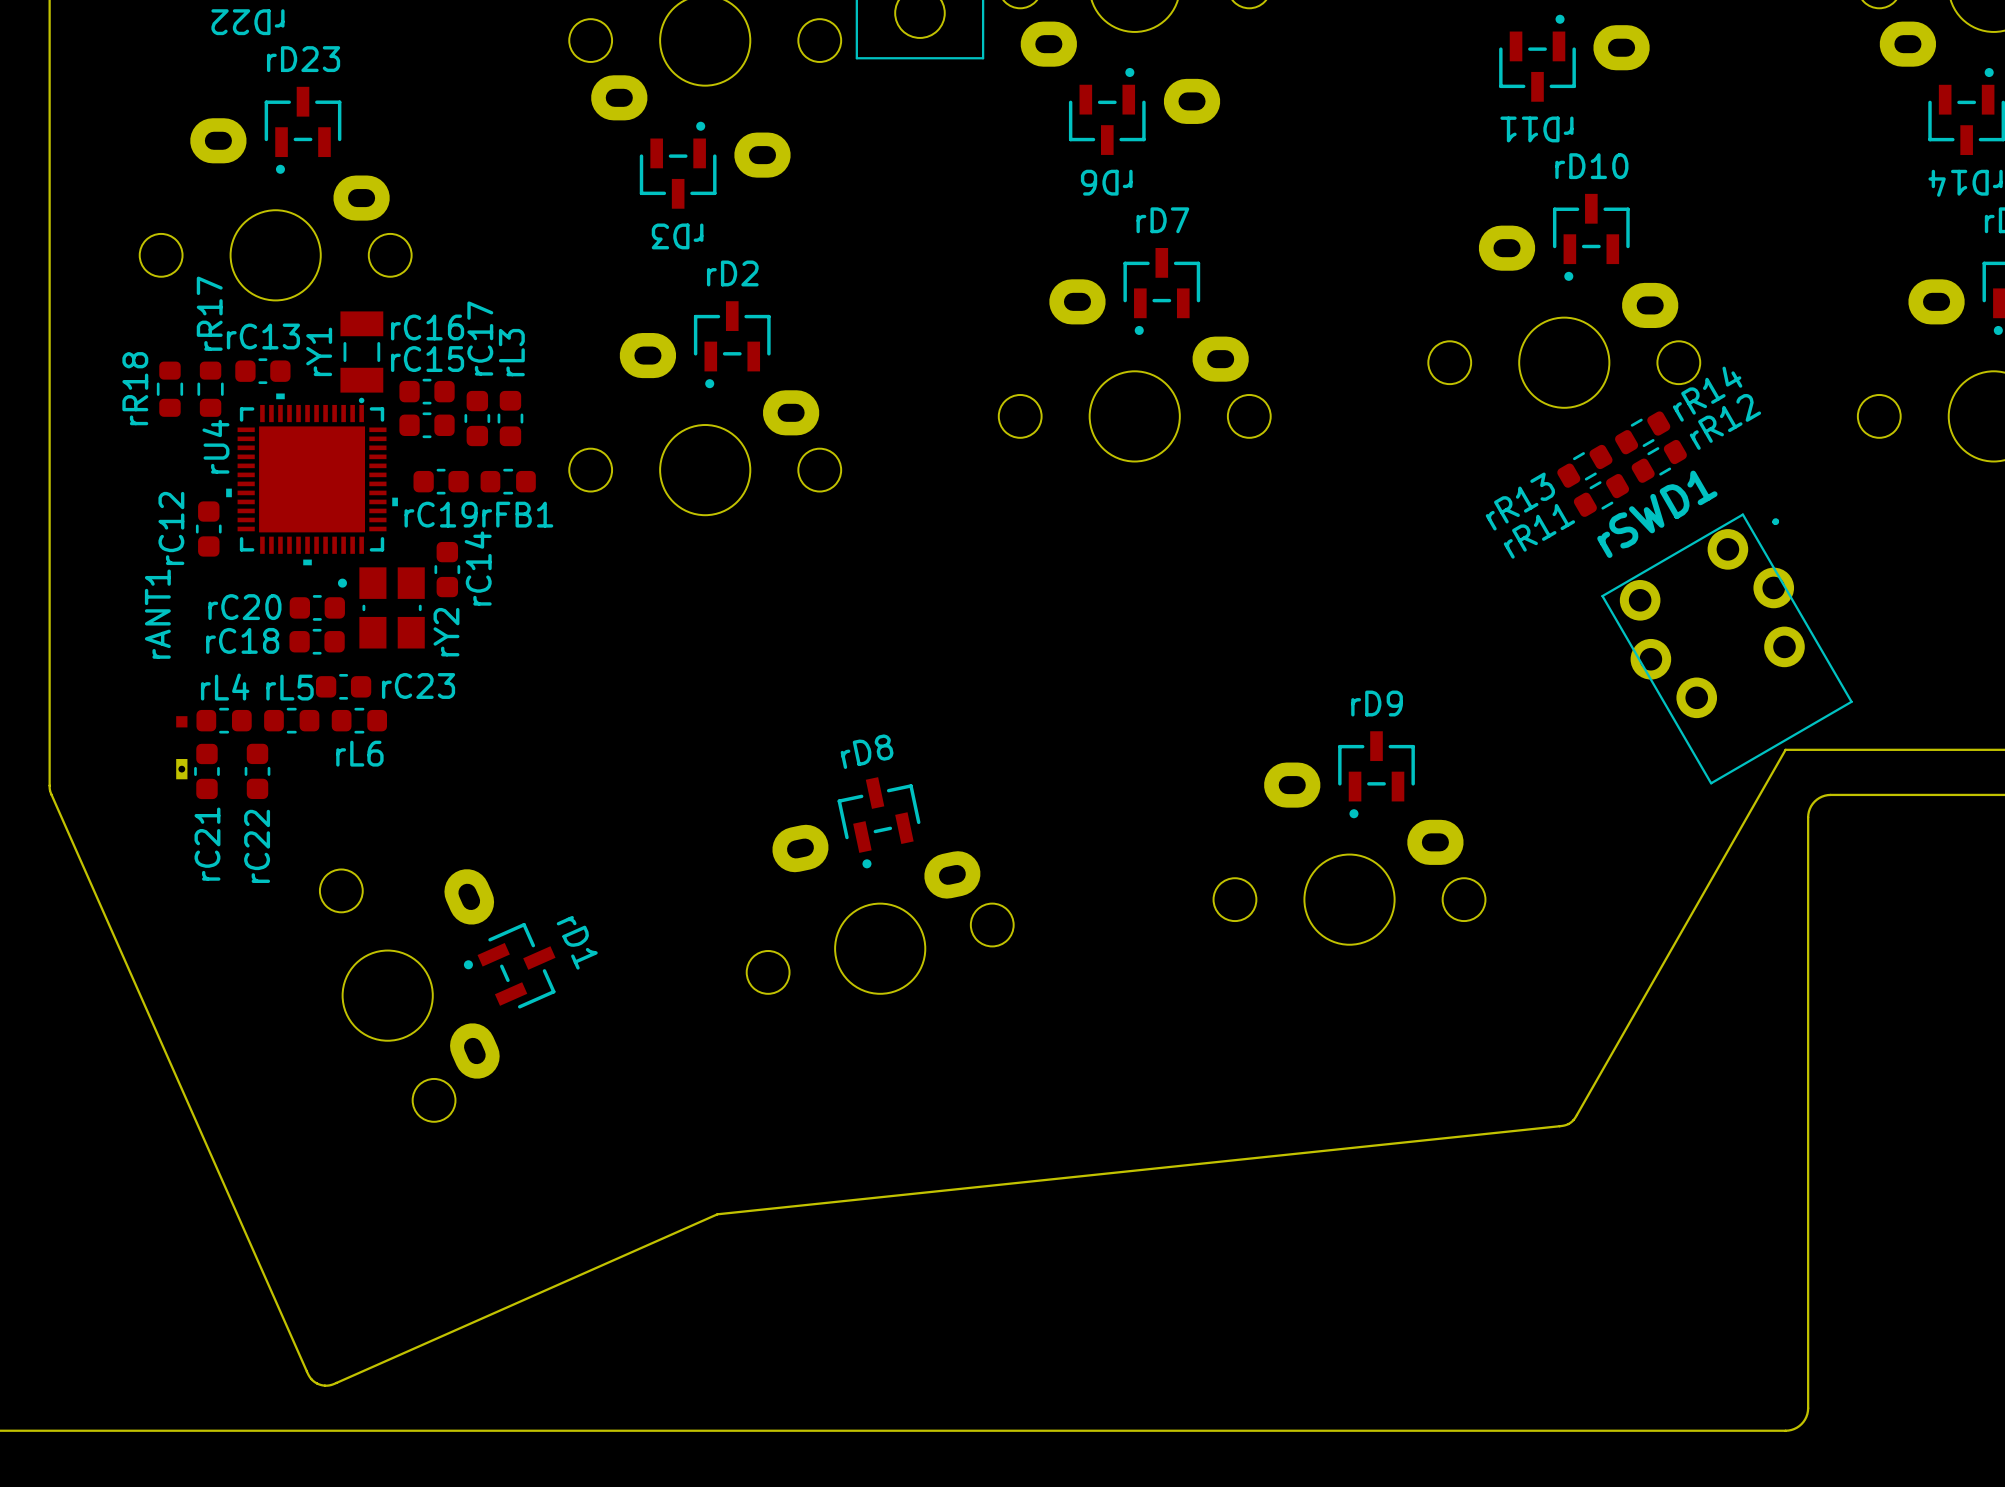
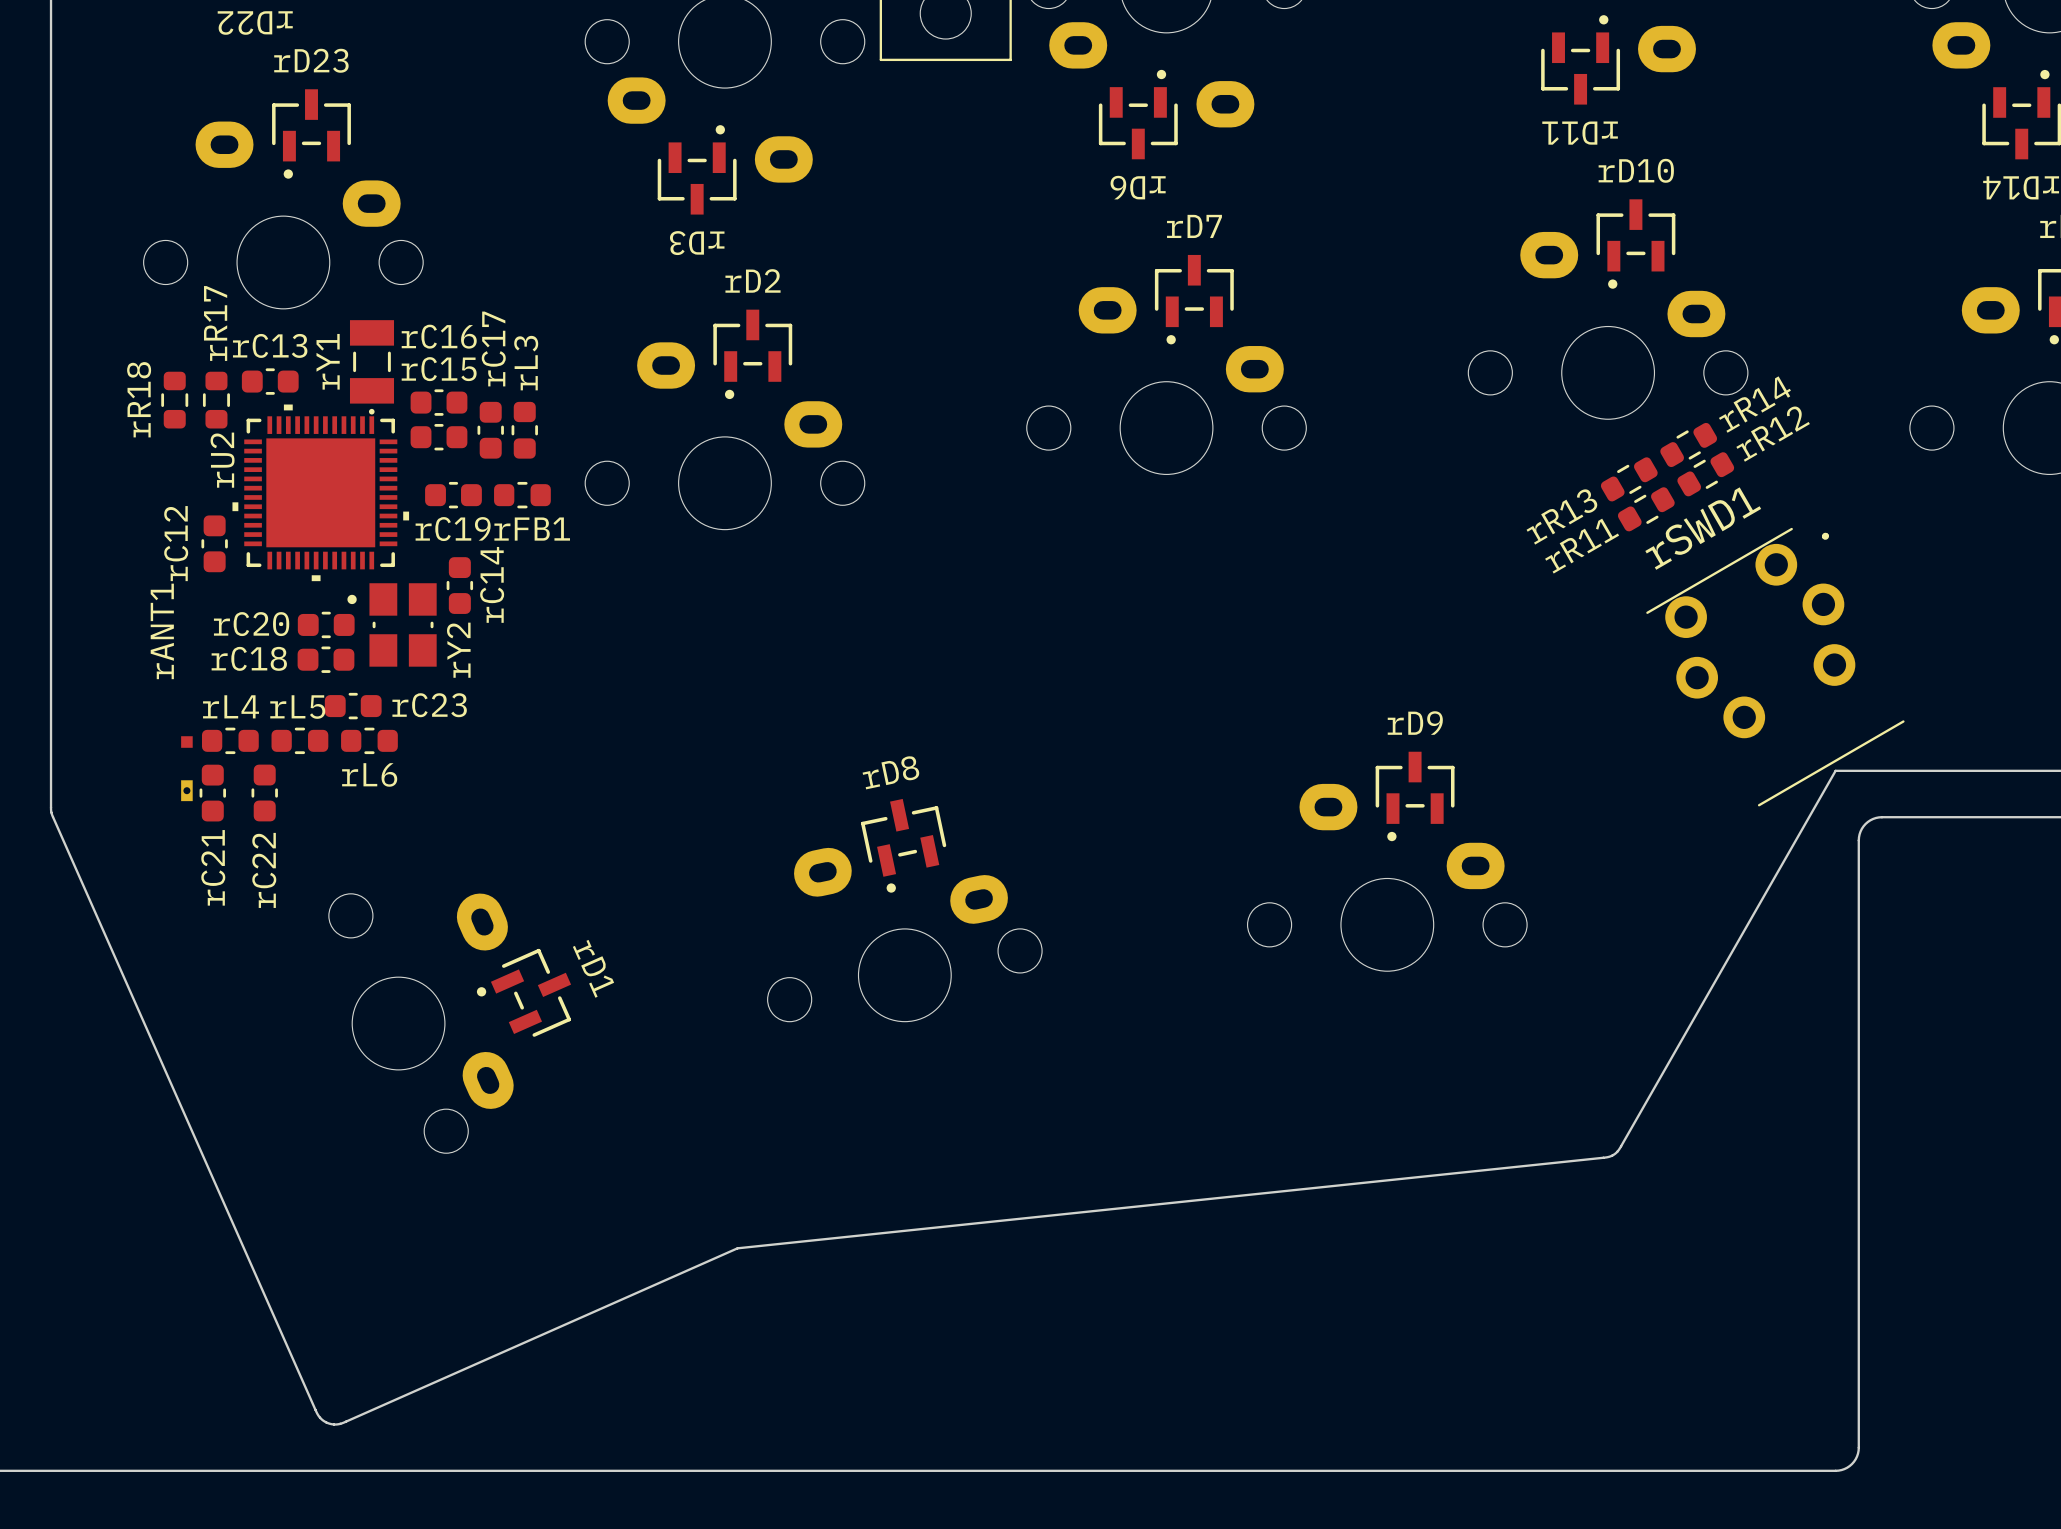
rU4 name: rU4 (215, 446) -> rU2 (222, 460)
rSWD1 footprint: [1601, 513, 1853, 785] -> [1646, 527, 1905, 807]

